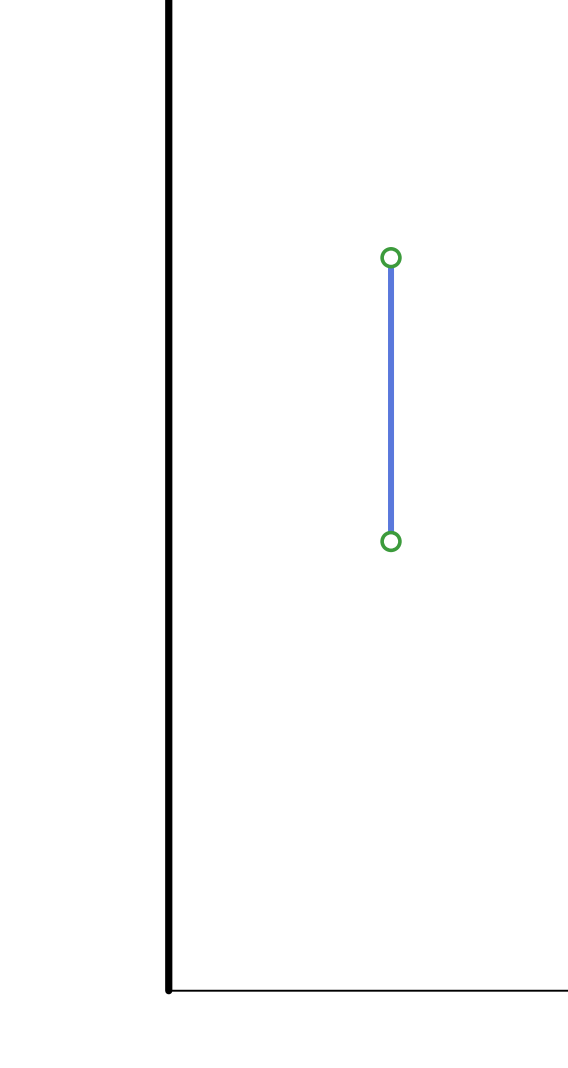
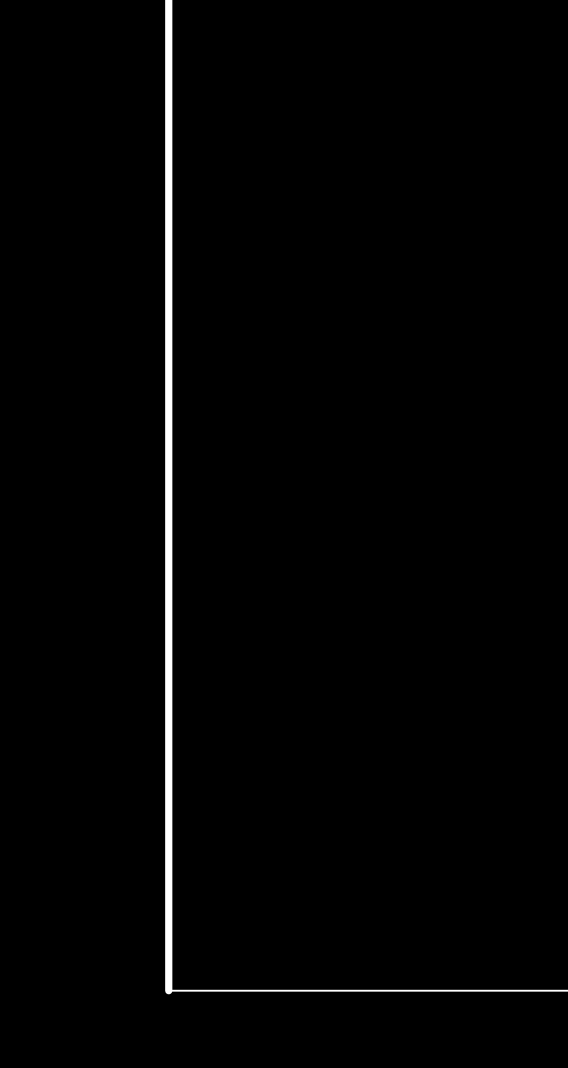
track: (391, 257) (391, 541) -> none
via: (391, 257) -> none
via: (391, 541) -> none

